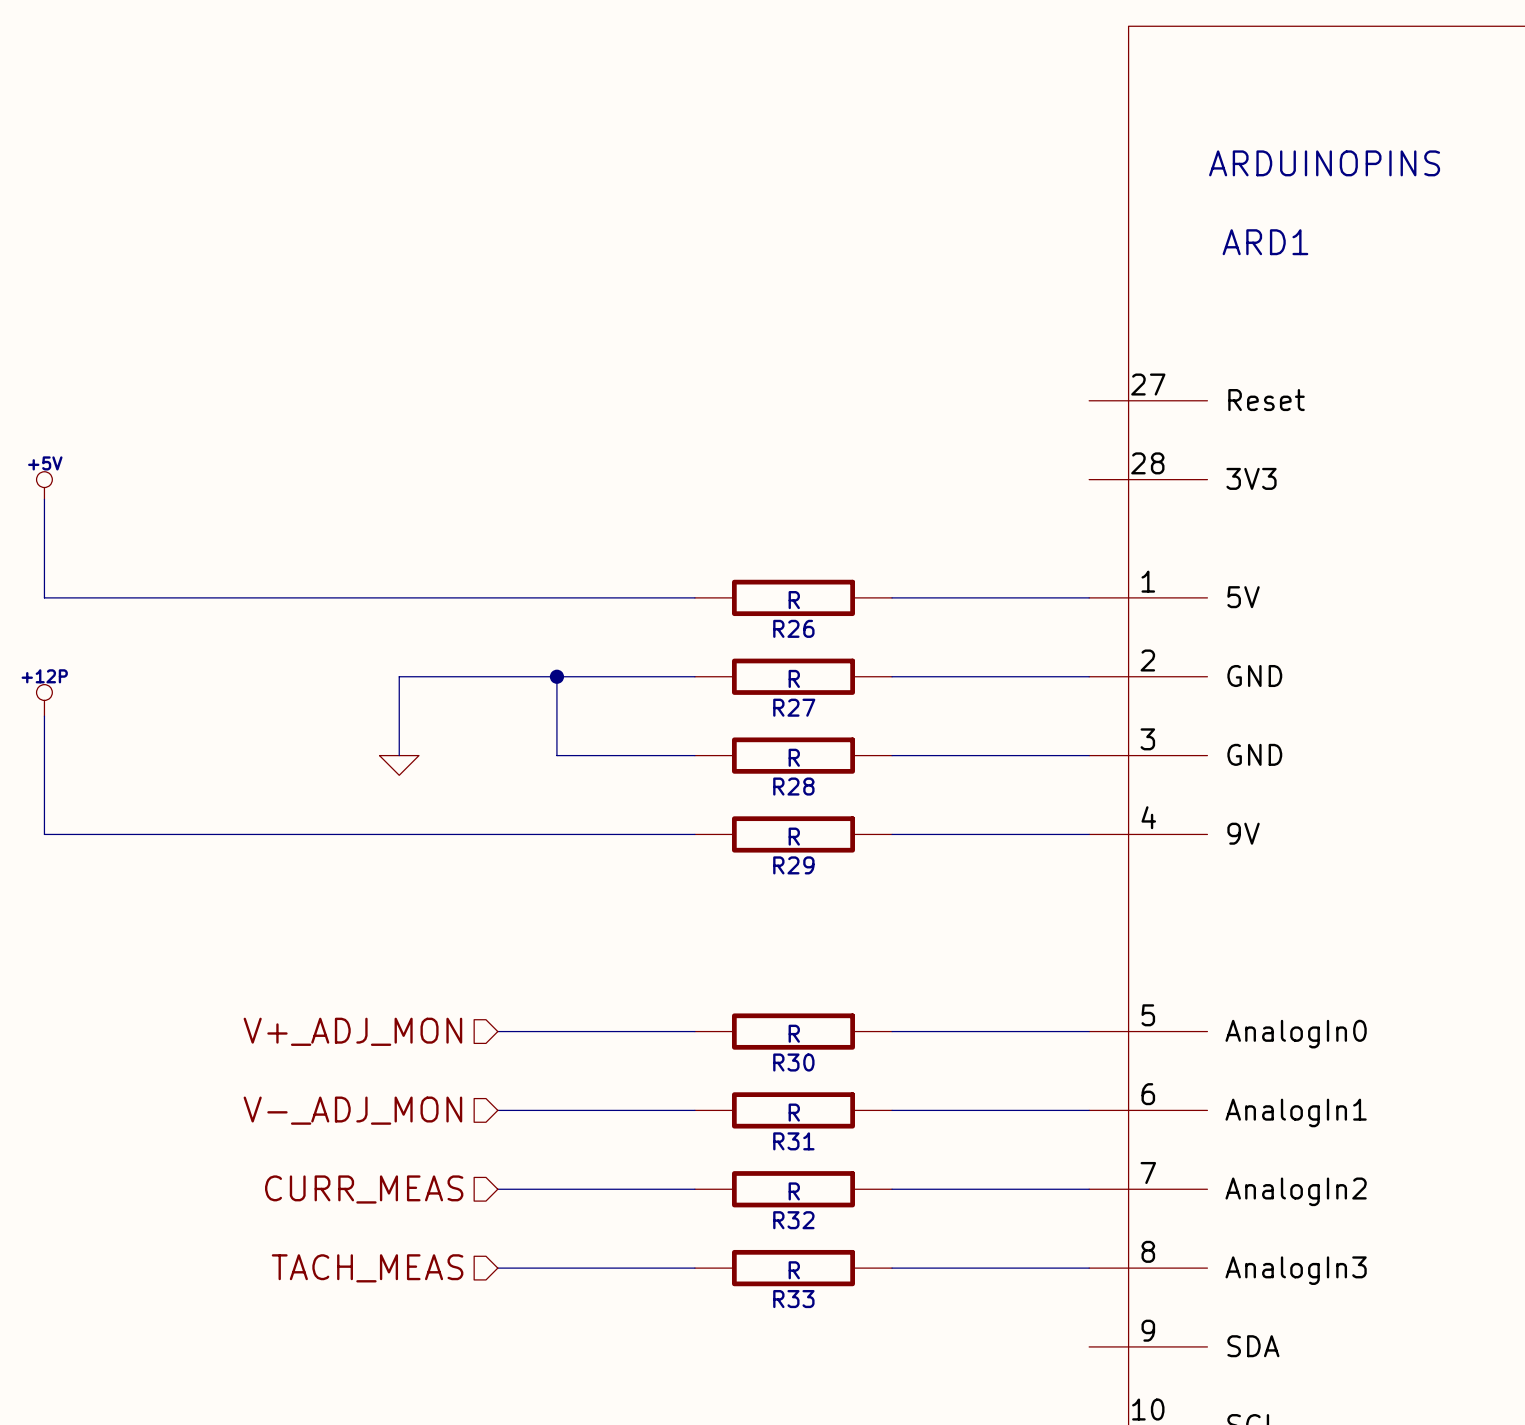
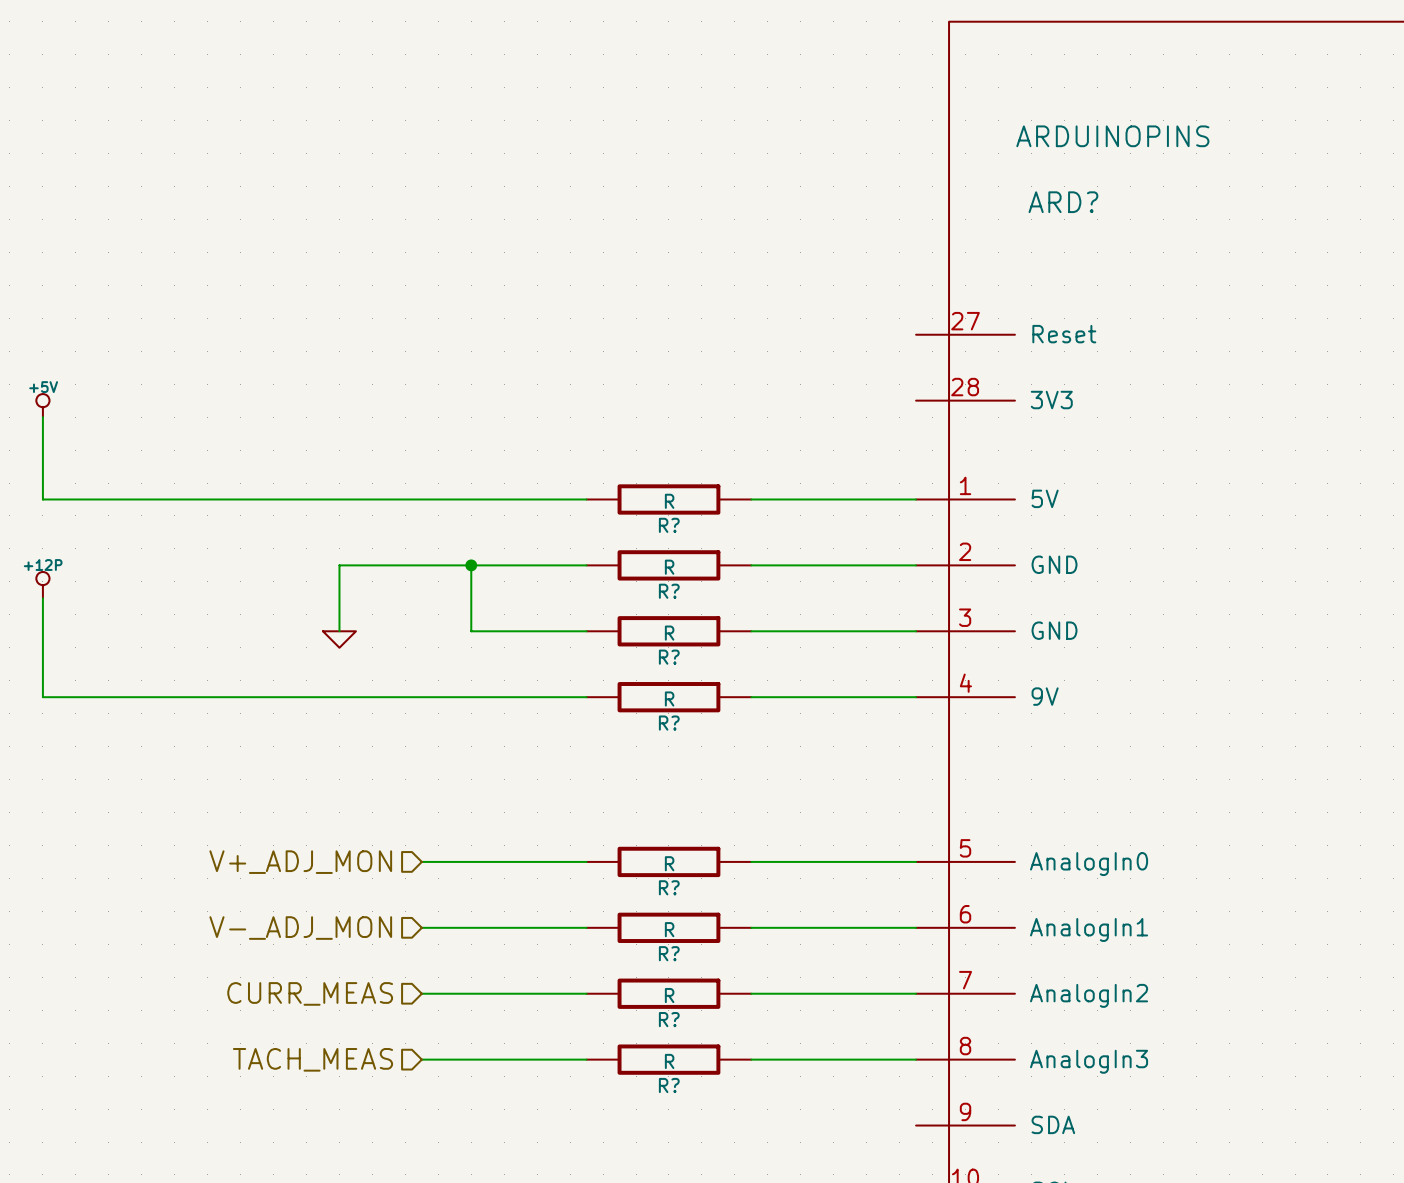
ARD1 name: ARD1 (1265, 242) -> ARD? (1063, 202)
R26 name: R26 (793, 628) -> R? (669, 525)
R27 name: R27 (794, 707) -> R? (669, 591)
R28 name: R28 (793, 786) -> R? (669, 657)
R29 name: R29 (793, 865) -> R? (669, 723)
R30 name: R30 (793, 1062) -> R? (669, 887)
R31 name: R31 (793, 1141) -> R? (669, 953)
R32 name: R32 (793, 1220) -> R? (669, 1019)
R33 name: R33 (793, 1299) -> R? (669, 1085)

